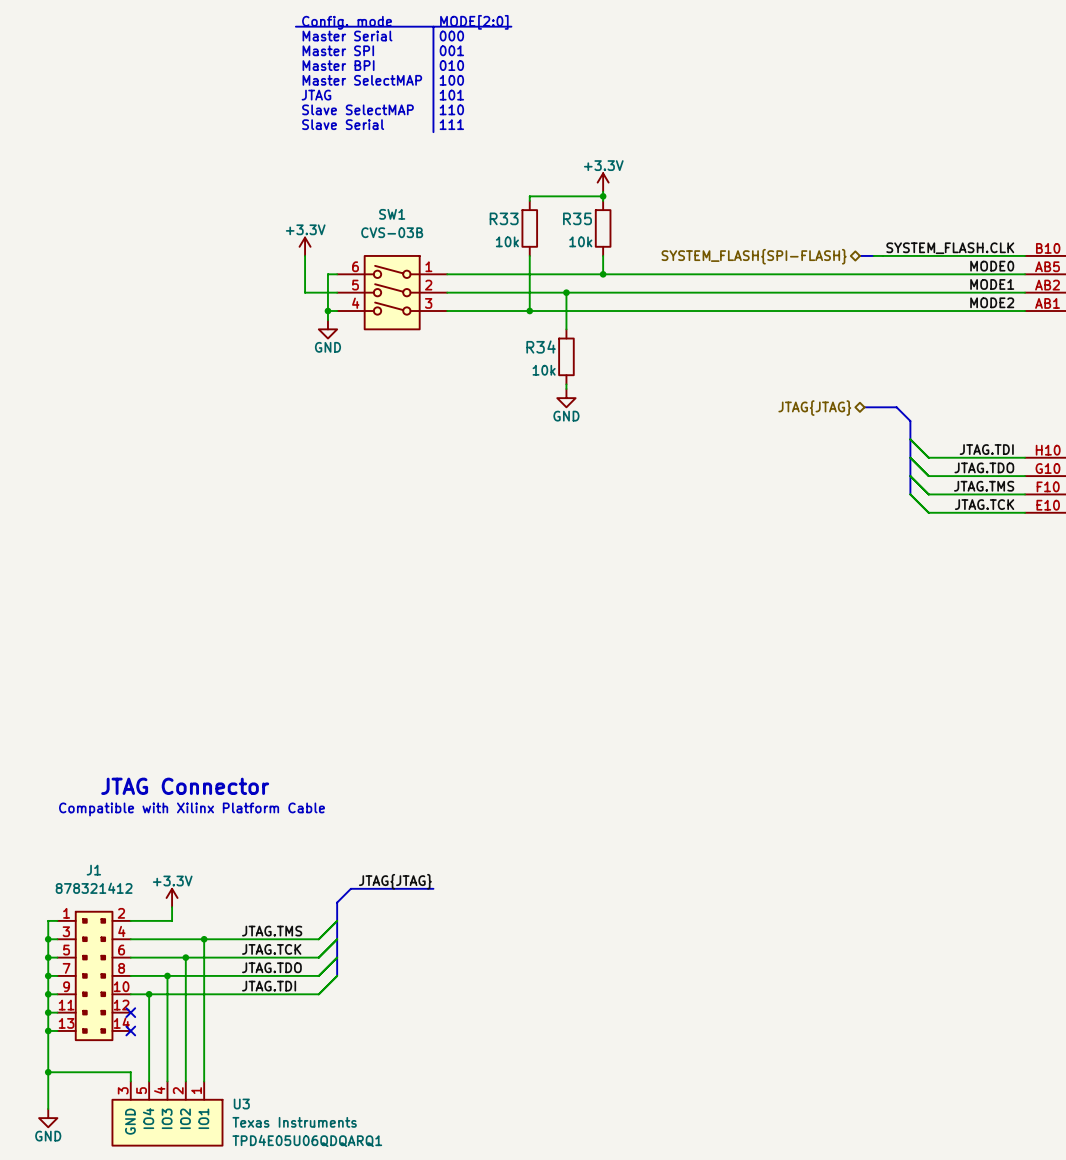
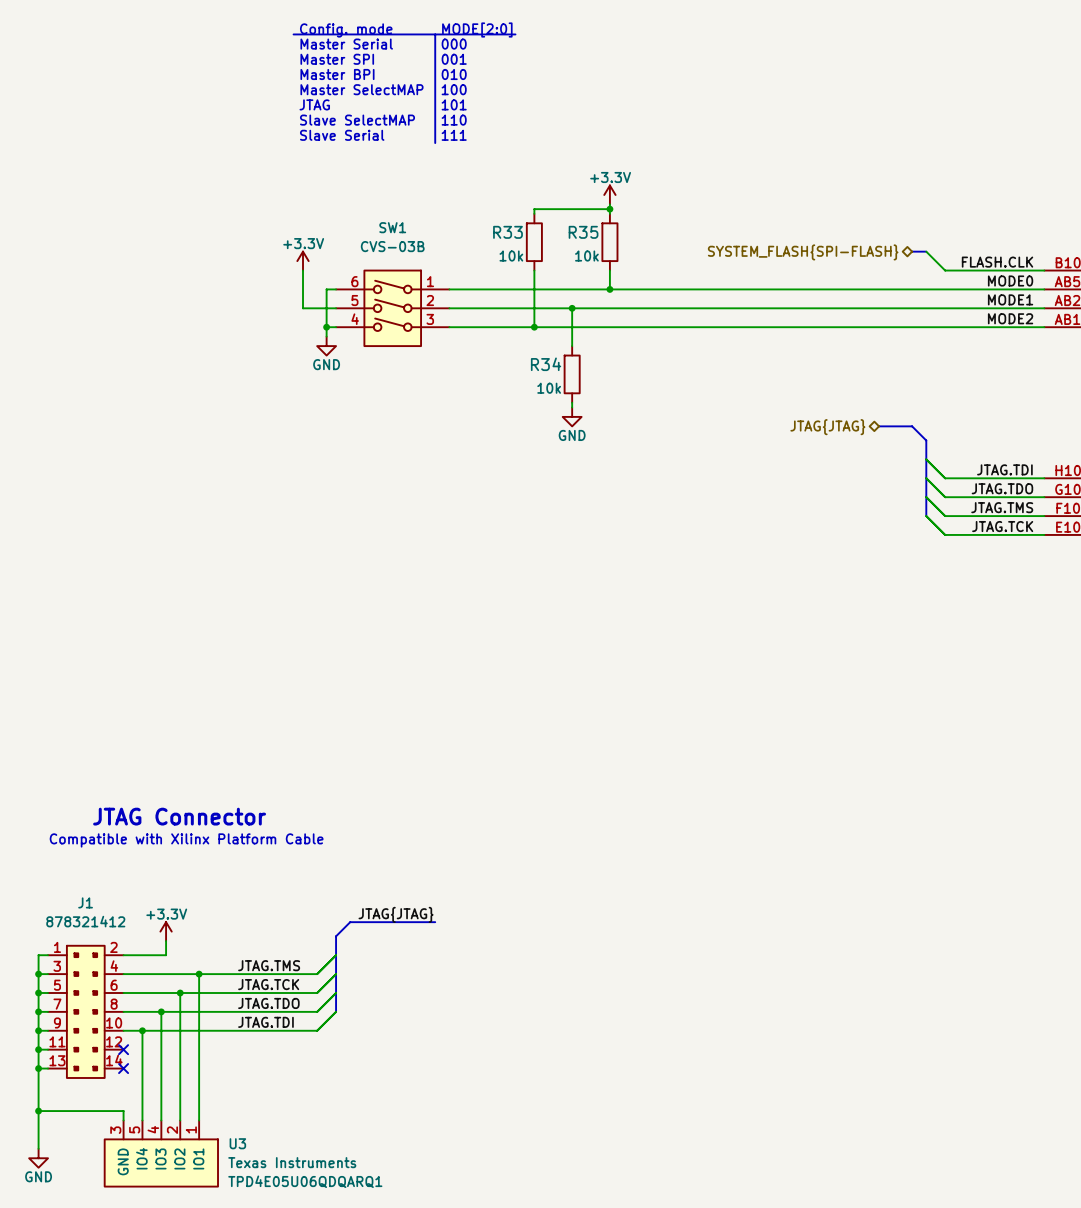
label: SYSTEM_FLASH.CLK (950, 248) -> FLASH.CLK (997, 262)
bus: (859, 255) (873, 255) -> (912, 251) (926, 251)
wire: (873, 255) (928, 255) -> (926, 251) (945, 270)
hierarchical label position: SYSTEM_FLASH{SPI-FLASH} (754, 256) -> SYSTEM_FLASH{SPI-FLASH} (803, 252)

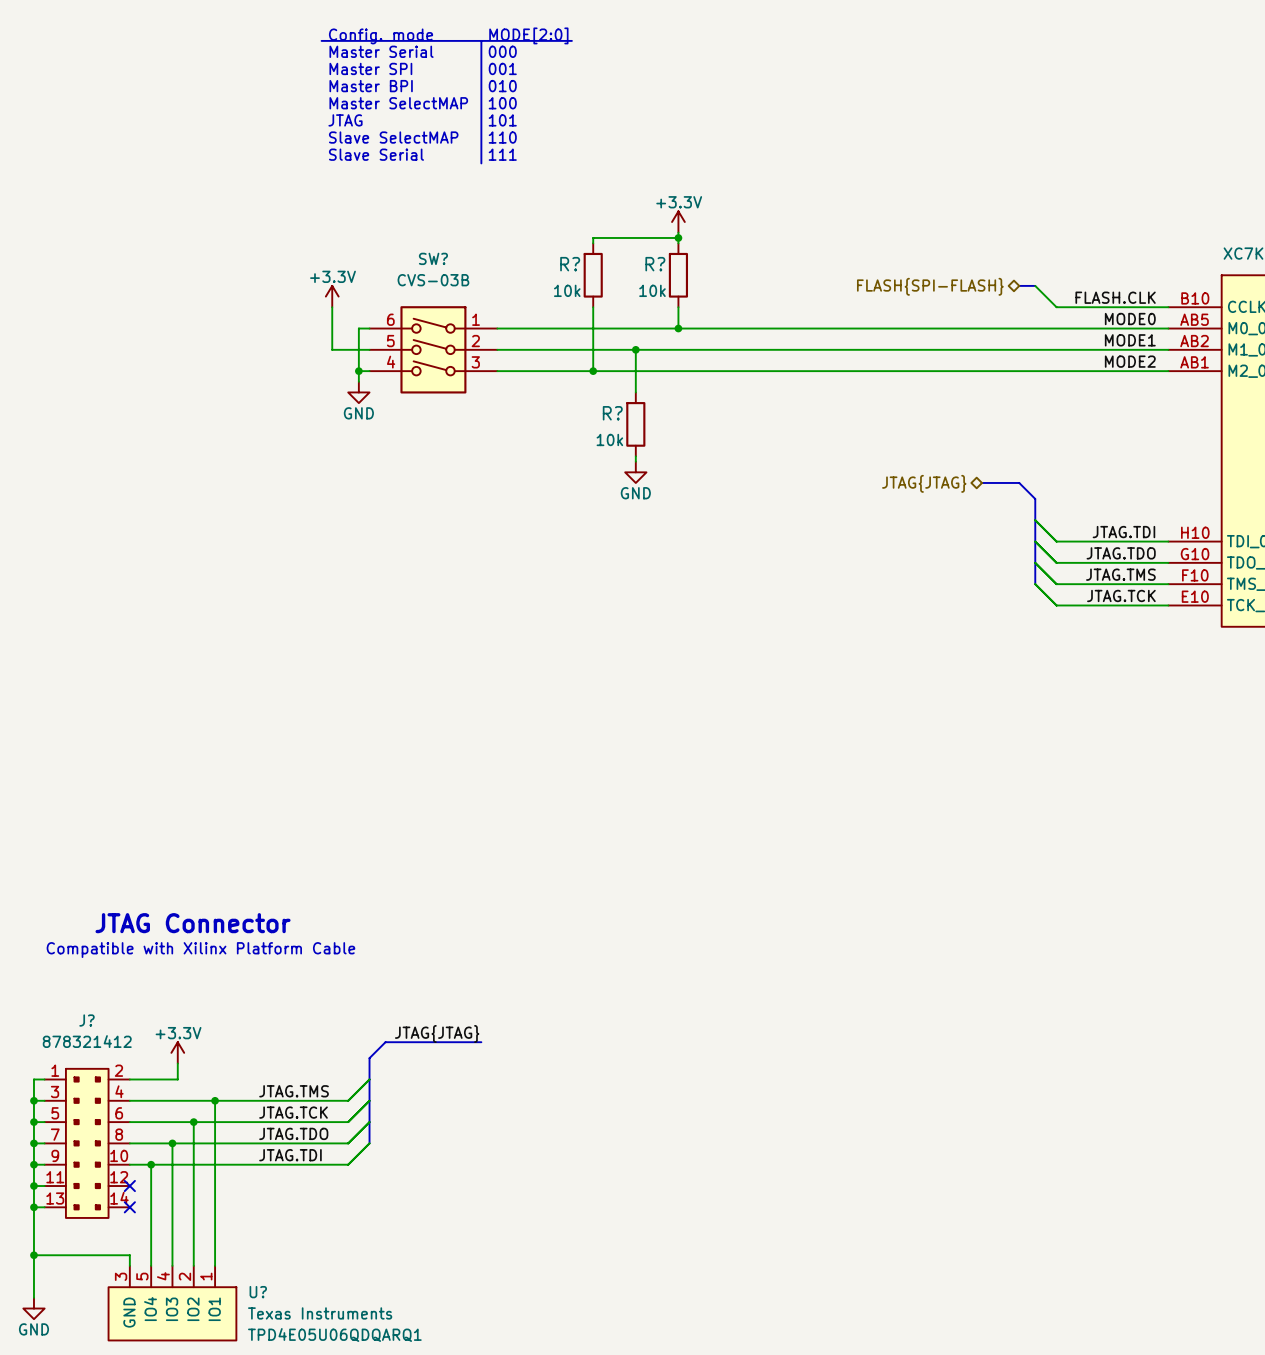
SW1 name: SW1 (392, 227) -> SW? (433, 258)
R33 name: R33 (508, 232) -> R? (570, 264)
R35 name: R35 (583, 232) -> R? (655, 264)
hierarchical label: SYSTEM_FLASH{SPI-FLASH} (803, 252) -> FLASH{SPI-FLASH} (930, 286)
R34 name: R34 (546, 364) -> R? (612, 413)
J1 name: J1 (85, 902) -> J? (86, 1020)
U3 name: U3 (237, 1143) -> U? (258, 1292)

